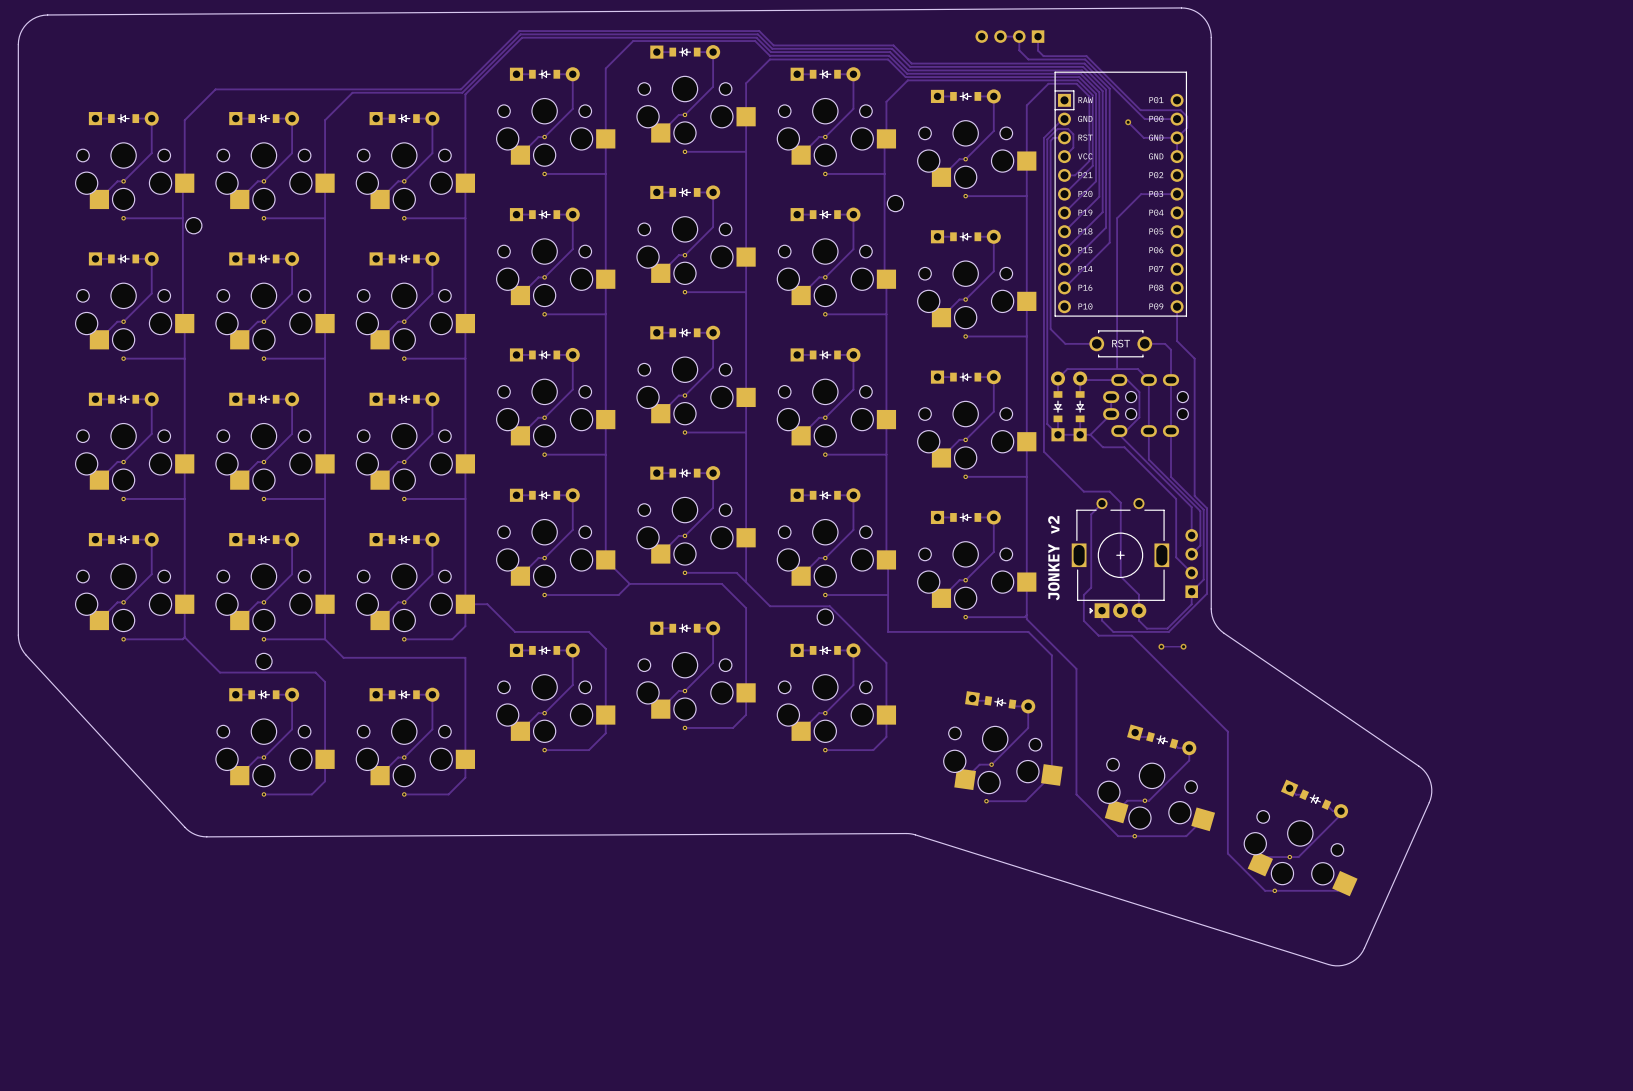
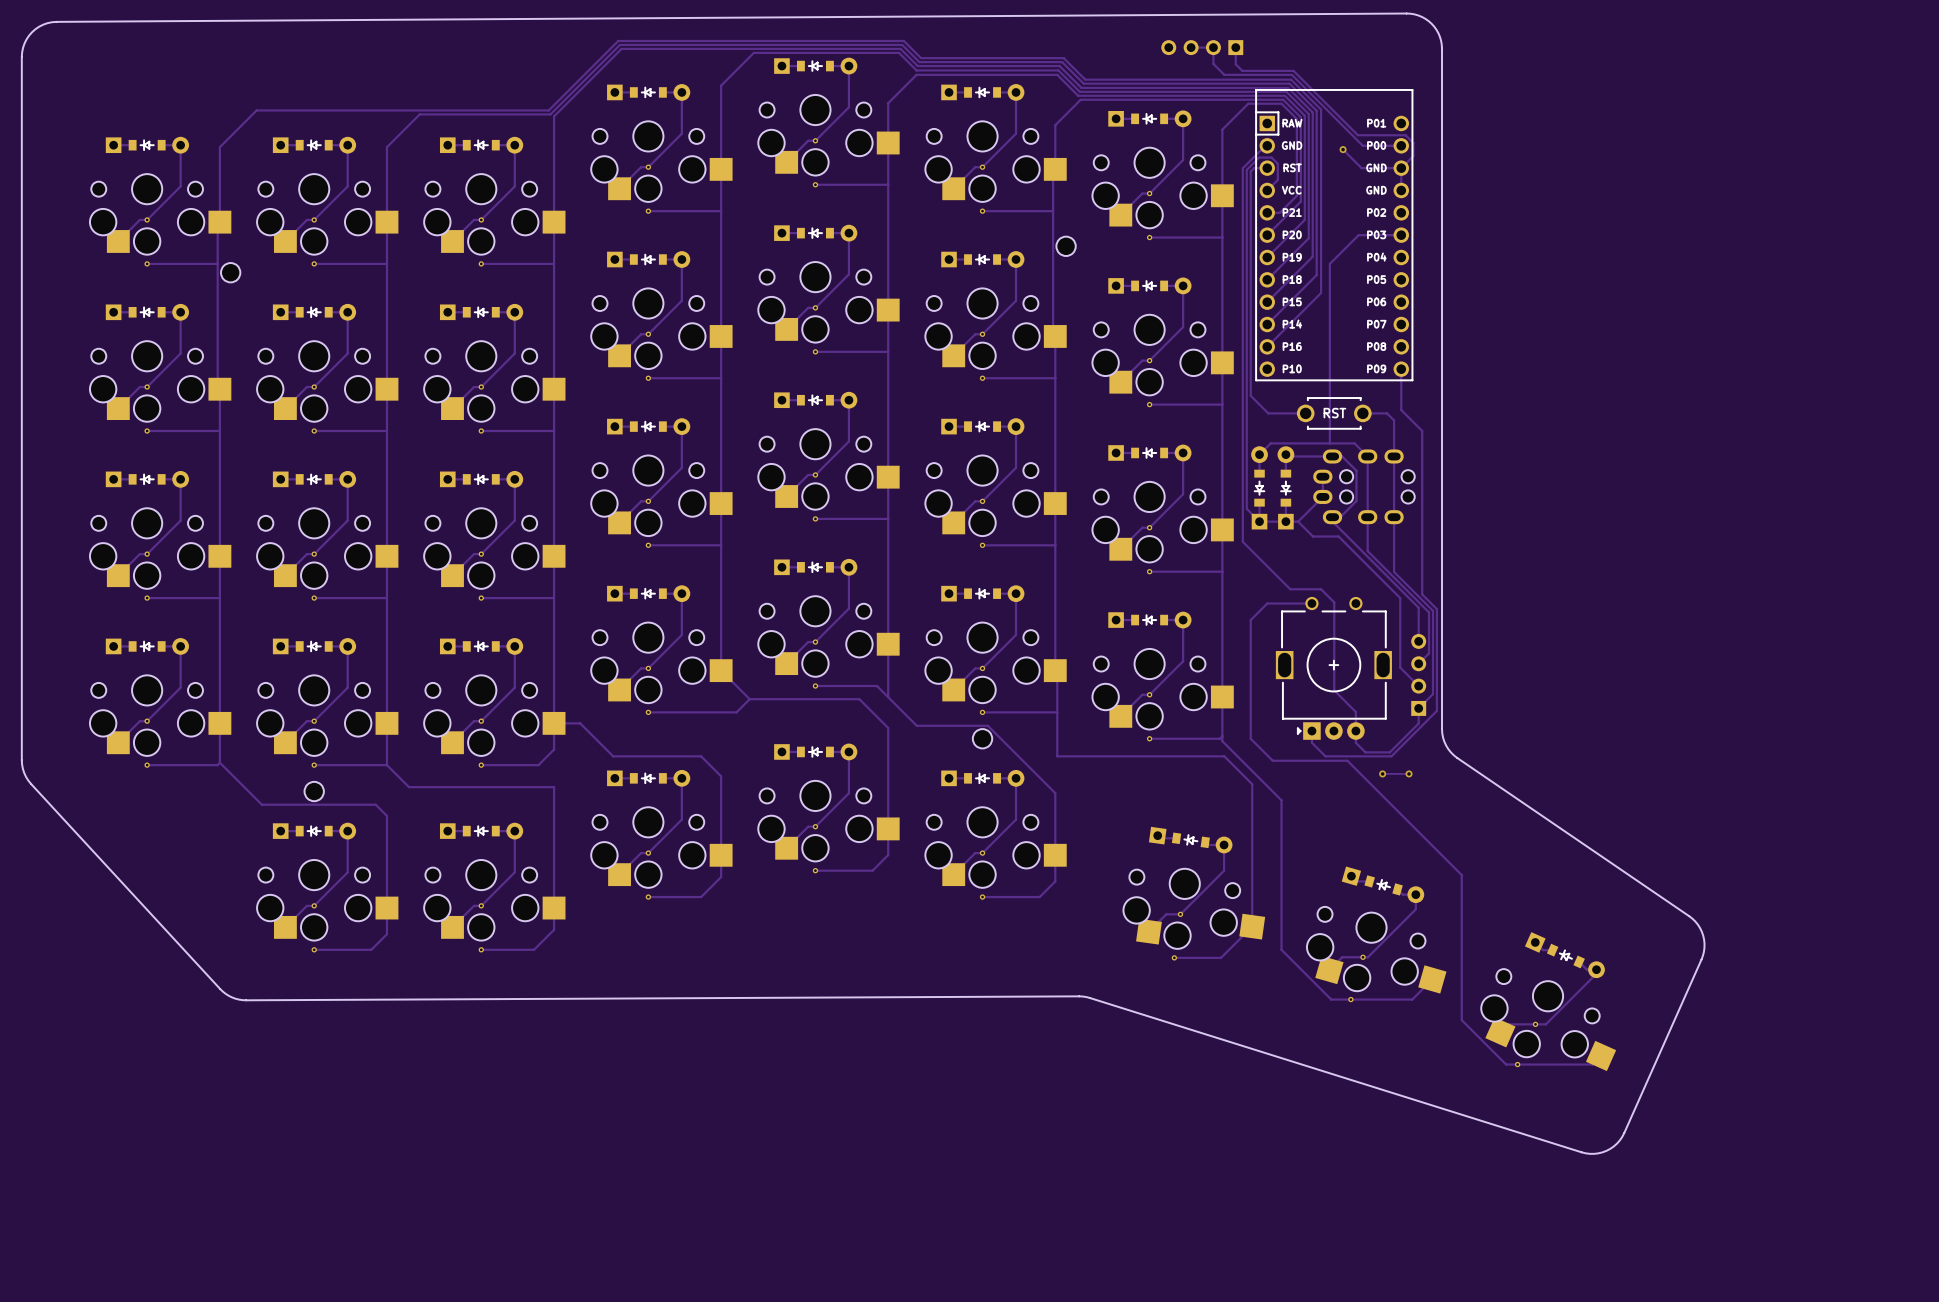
track: (1102, 503) (1091, 514) (1091, 587) (1083, 595) (1083, 620) (1098, 635) -> (1311, 603) (1267, 603) (1250, 620) (1250, 738) (1272, 760) (1307, 760)
text: JONKEY v2 (1053, 558) -> none

